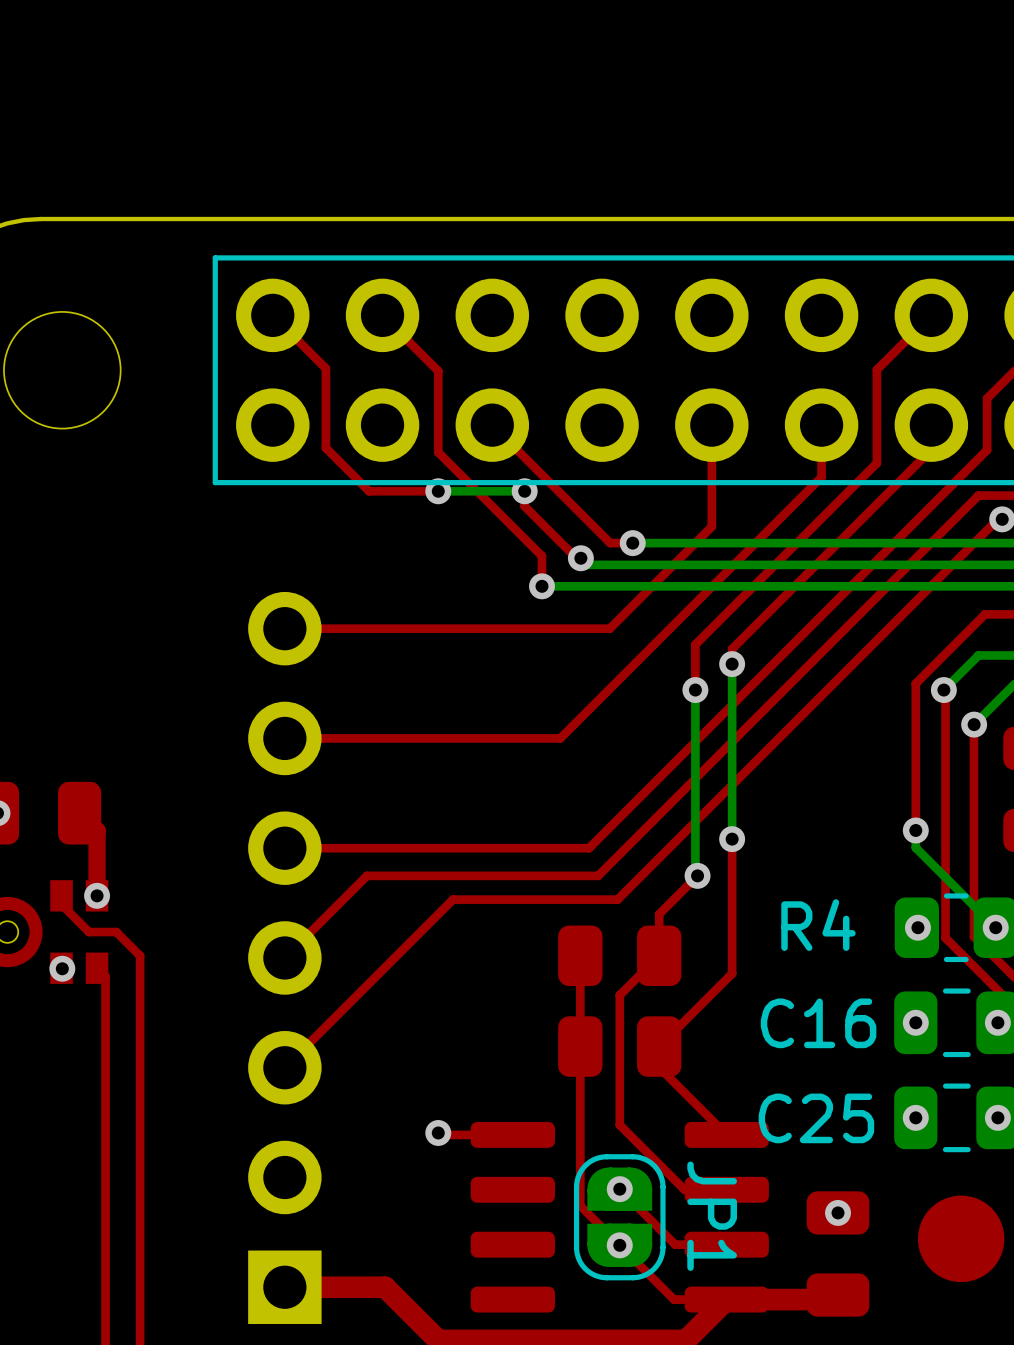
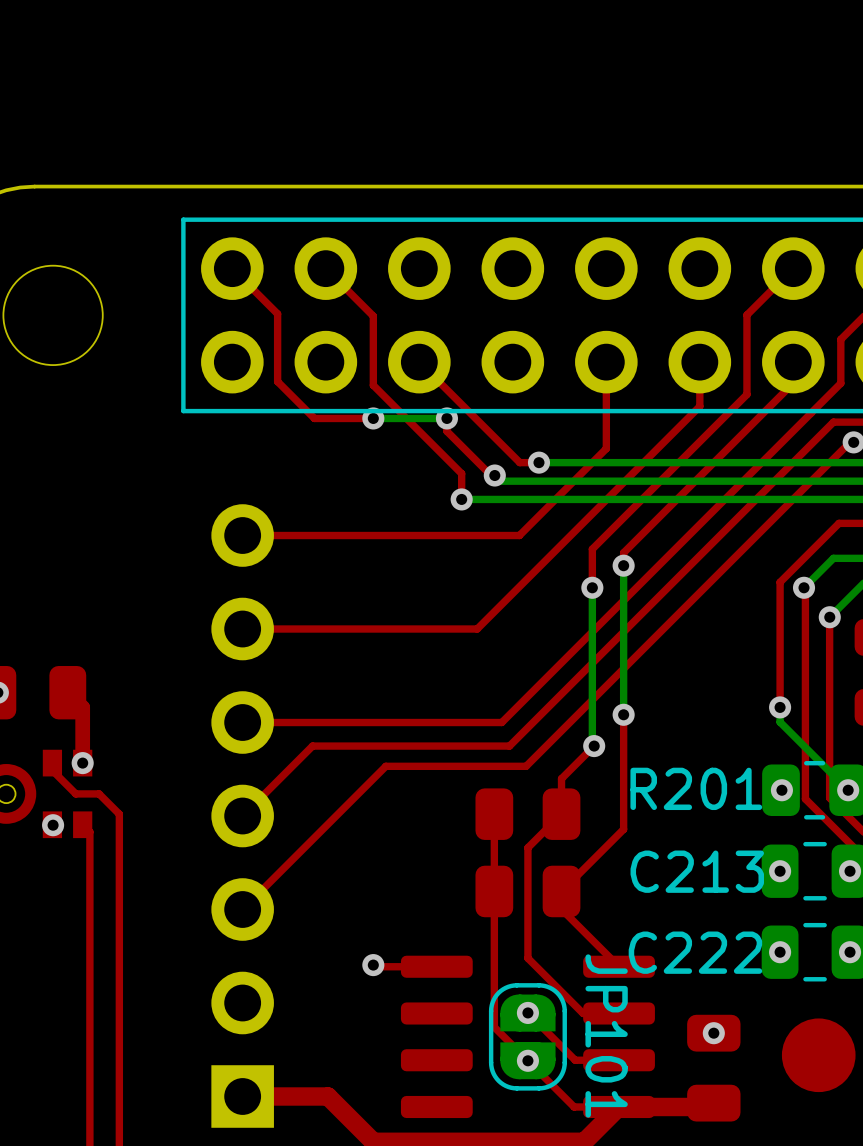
R4 name: R4 (818, 925) -> R201 (696, 788)
C16 name: C16 (818, 1023) -> C213 (697, 871)
C25 name: C25 (816, 1118) -> C222 (695, 952)
JP1 name: JP1 (712, 1216) -> JP101 (606, 1035)

